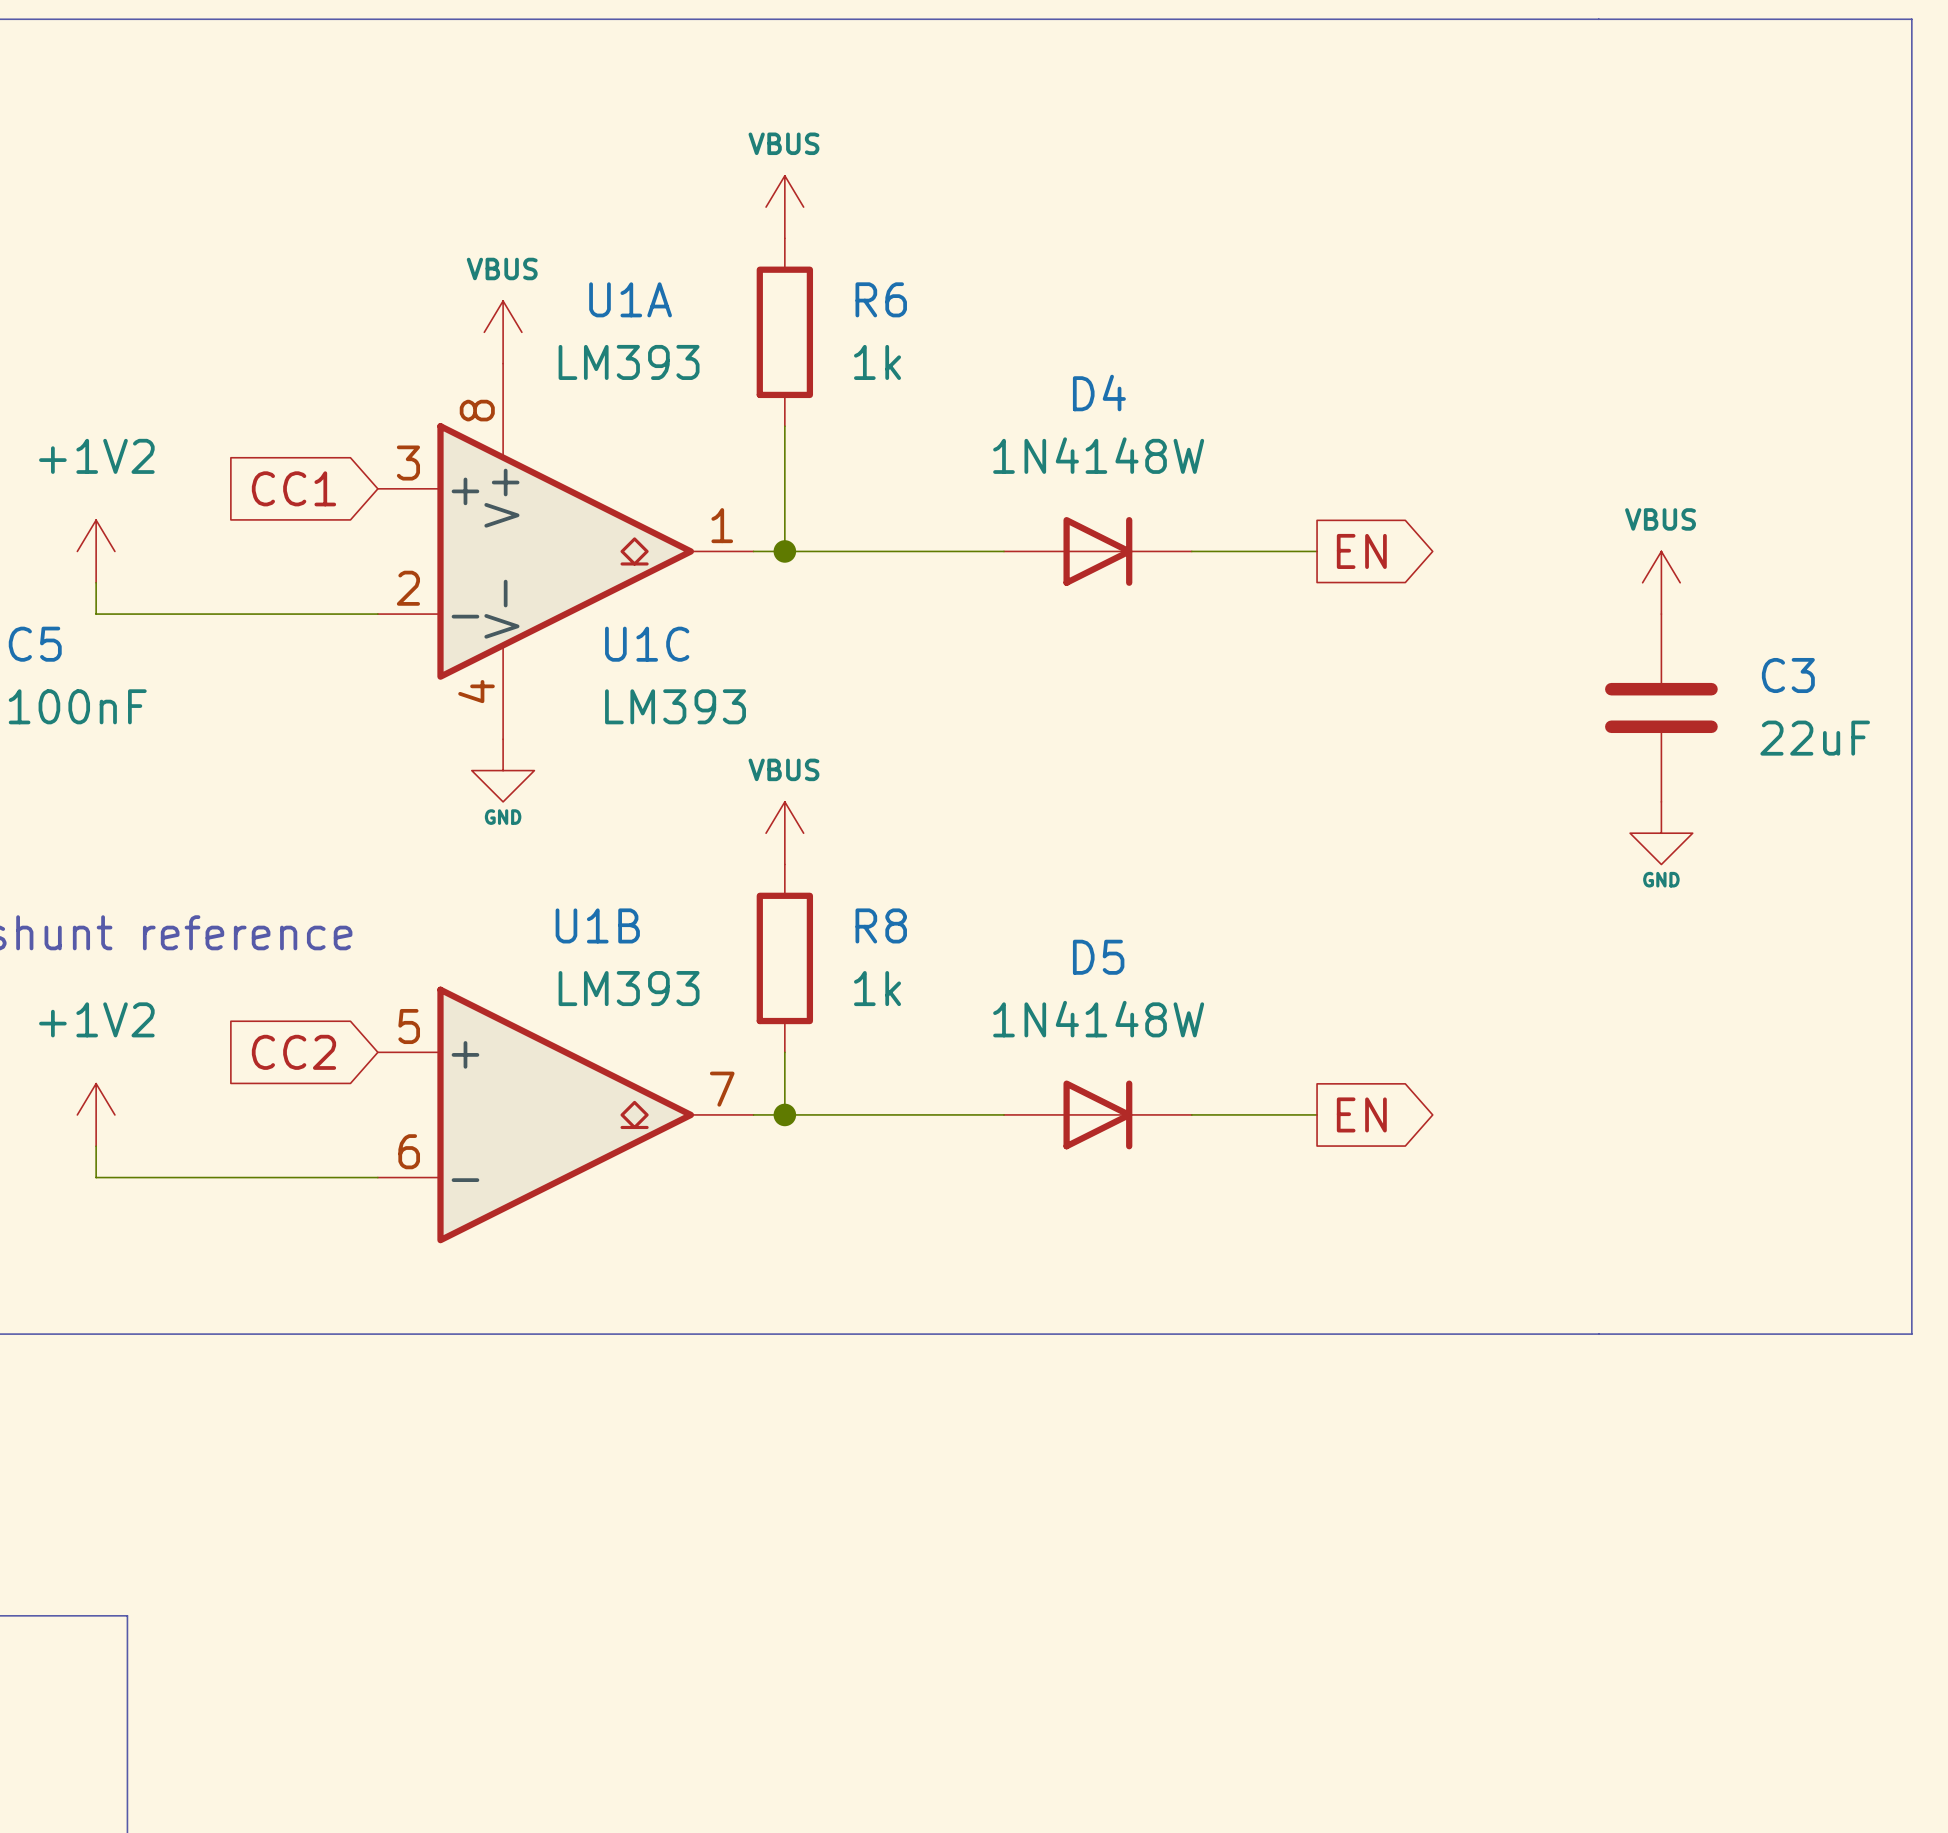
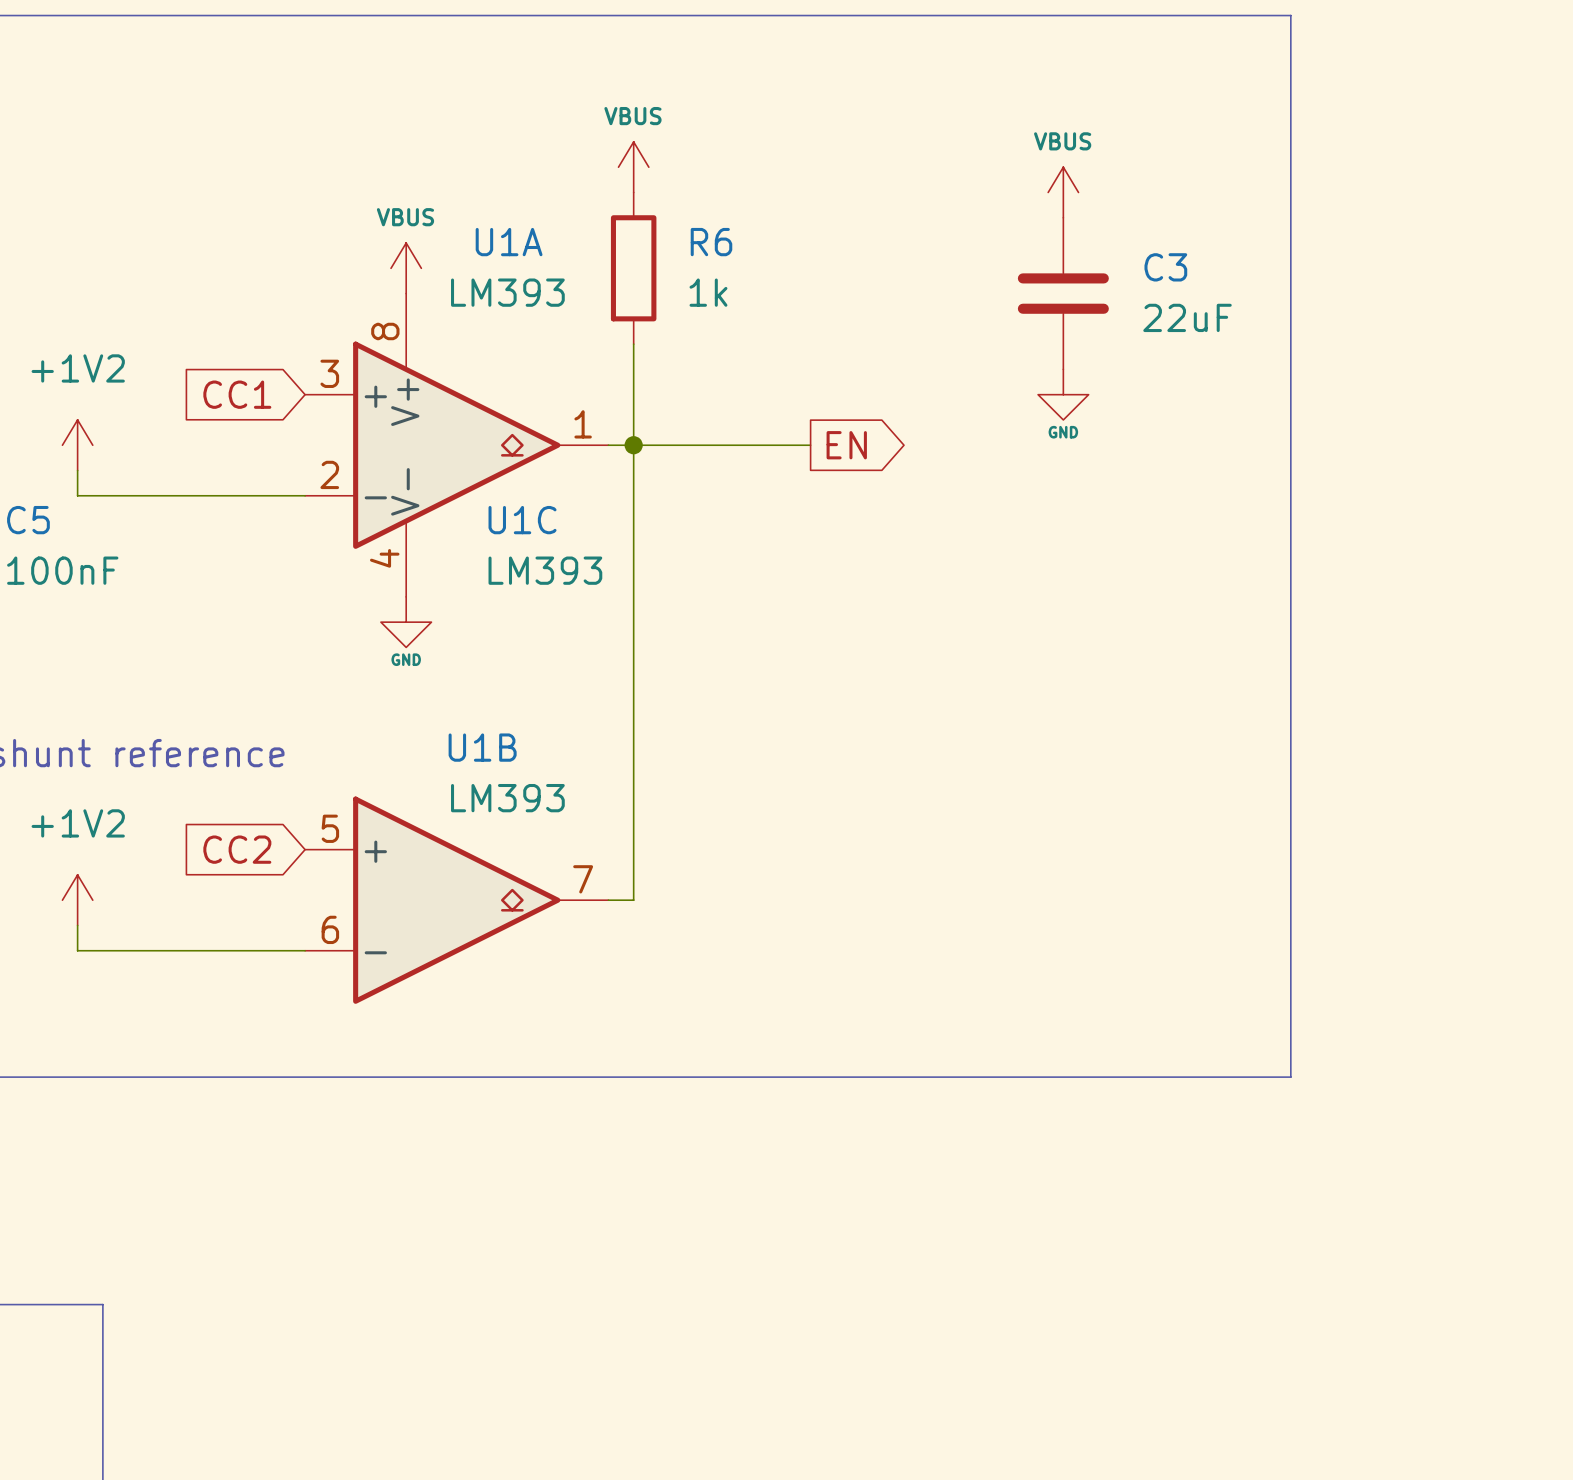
line: (1598, 19) (1911, 19) (1911, 1334) (1598, 1334) -> (1290, 15) (1290, 1077)
power symbol: none -> VBUS (1063, 192)
wire: none -> (633, 445) (633, 849)
D4: 1N4148W (1097, 551) -> none
wire: (1191, 551) (1317, 551) -> none
global label position: EN (1361, 551) -> EN (846, 445)
power symbol: VBUS (1661, 582) -> none
C3 position: (1661, 707) -> (1063, 293)
power symbol: VBUS (784, 833) -> none
power symbol position: GND (1661, 833) -> GND (1063, 394)
R8: 1k (784, 958) -> none
wire: (784, 1114) (1003, 1114) -> none
junction: (784, 1114) -> none
D5: 1N4148W (1097, 1114) -> none
wire: (1191, 1114) (1317, 1114) -> none
global label: EN (1361, 1114) -> none

